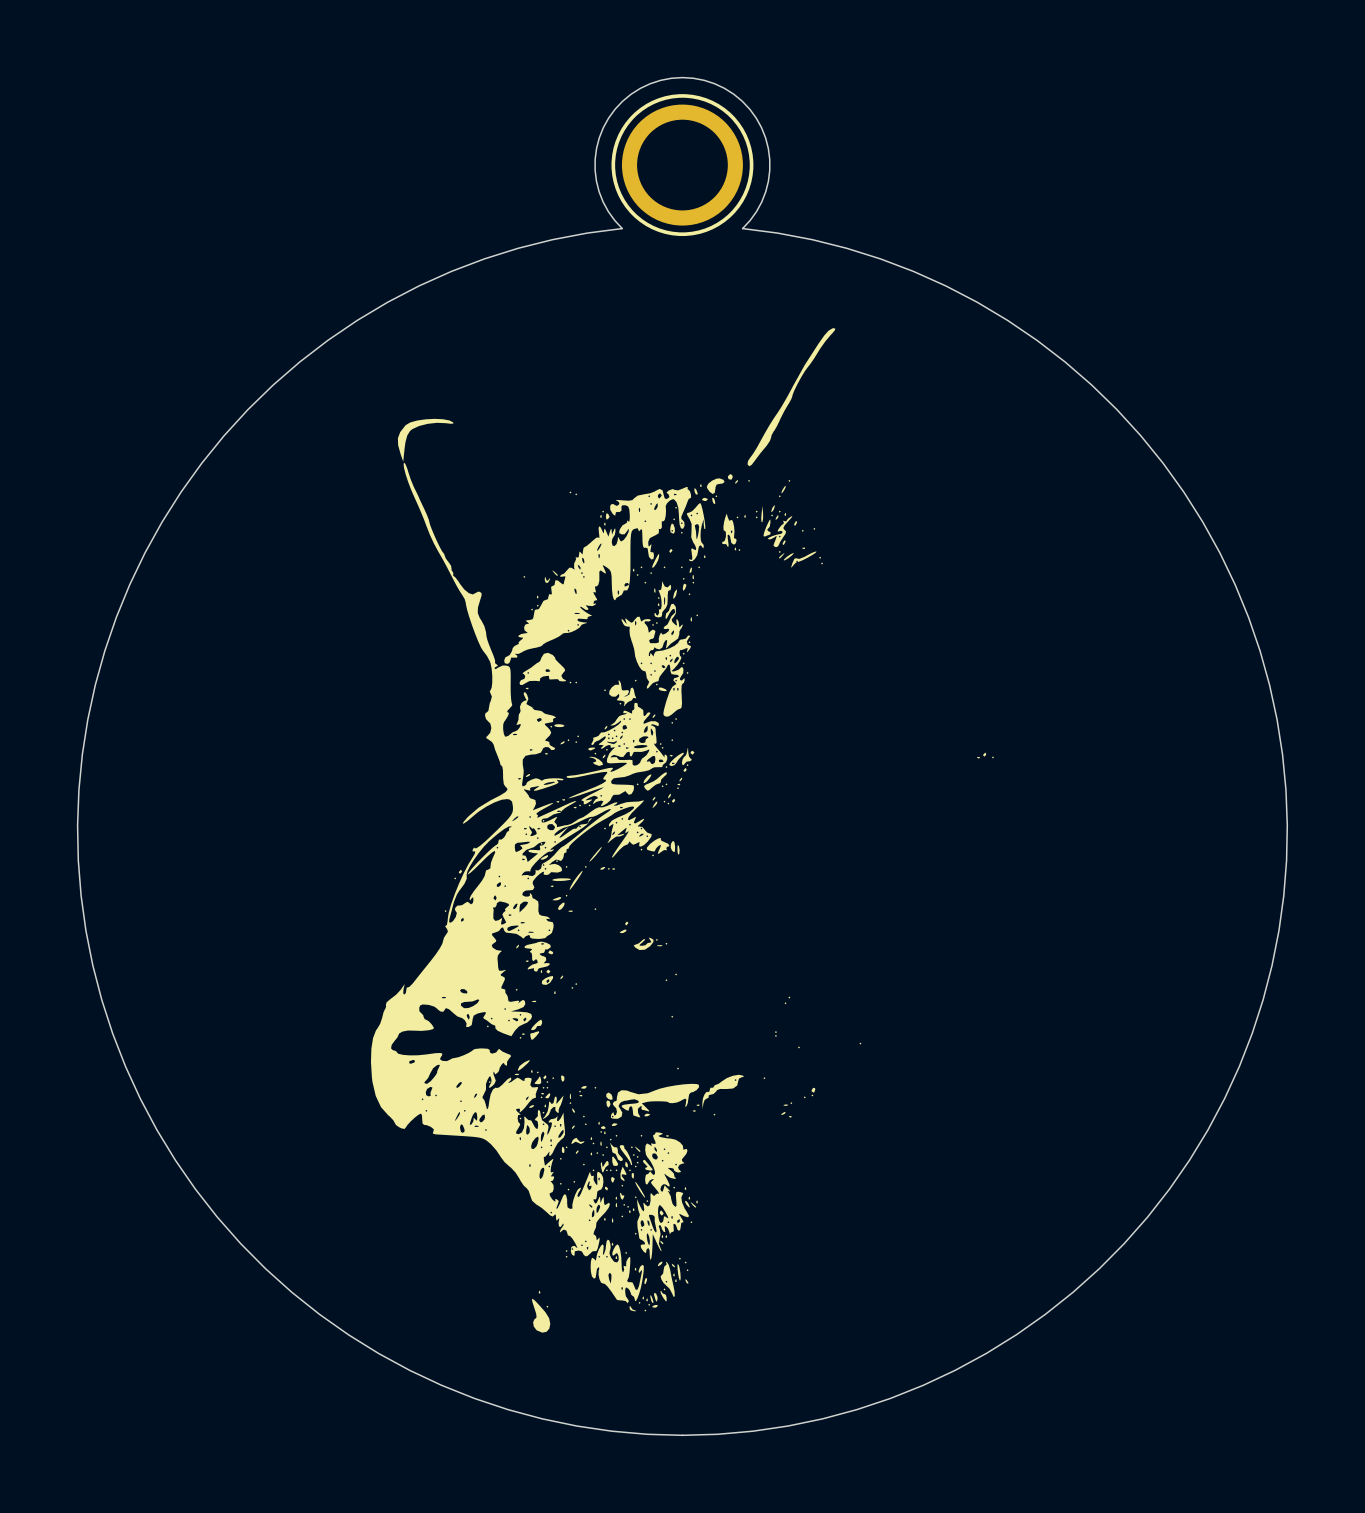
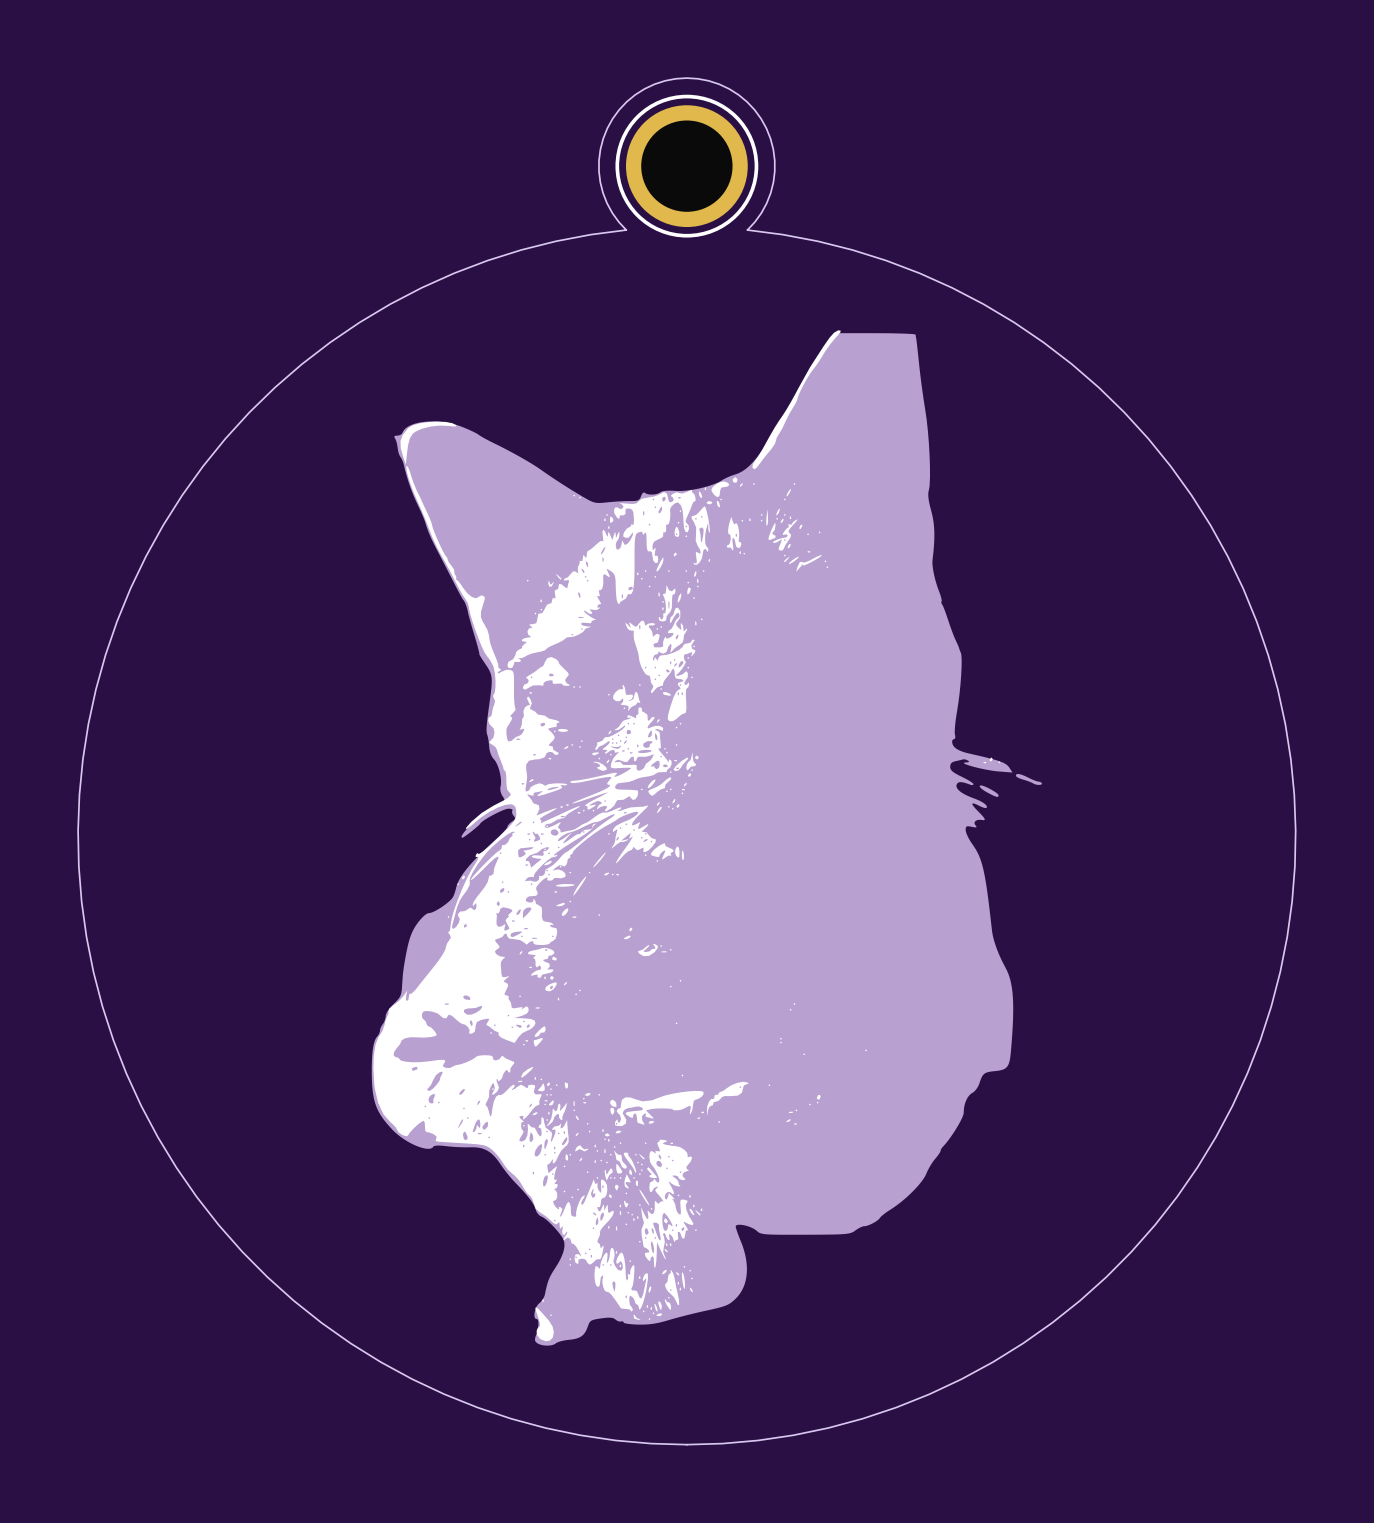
drawing: none -> [371, 333, 1042, 1346]

